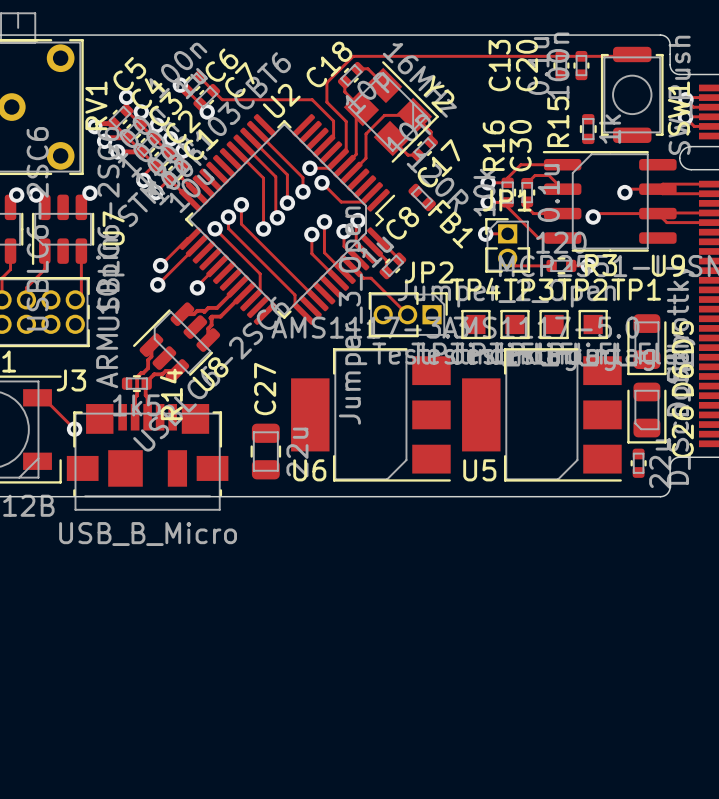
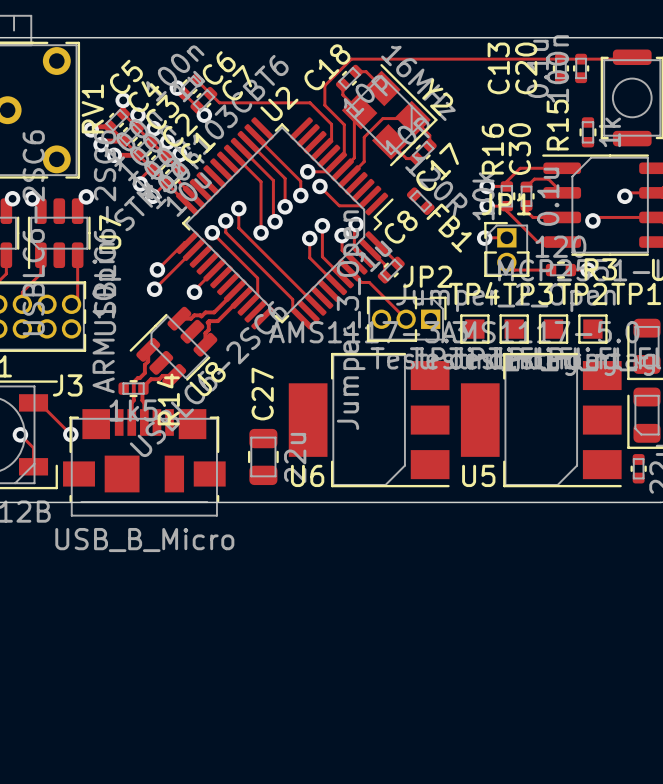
track: none -> (20, 434) (33, 447) (33, 466)
via: none -> (20, 434)

